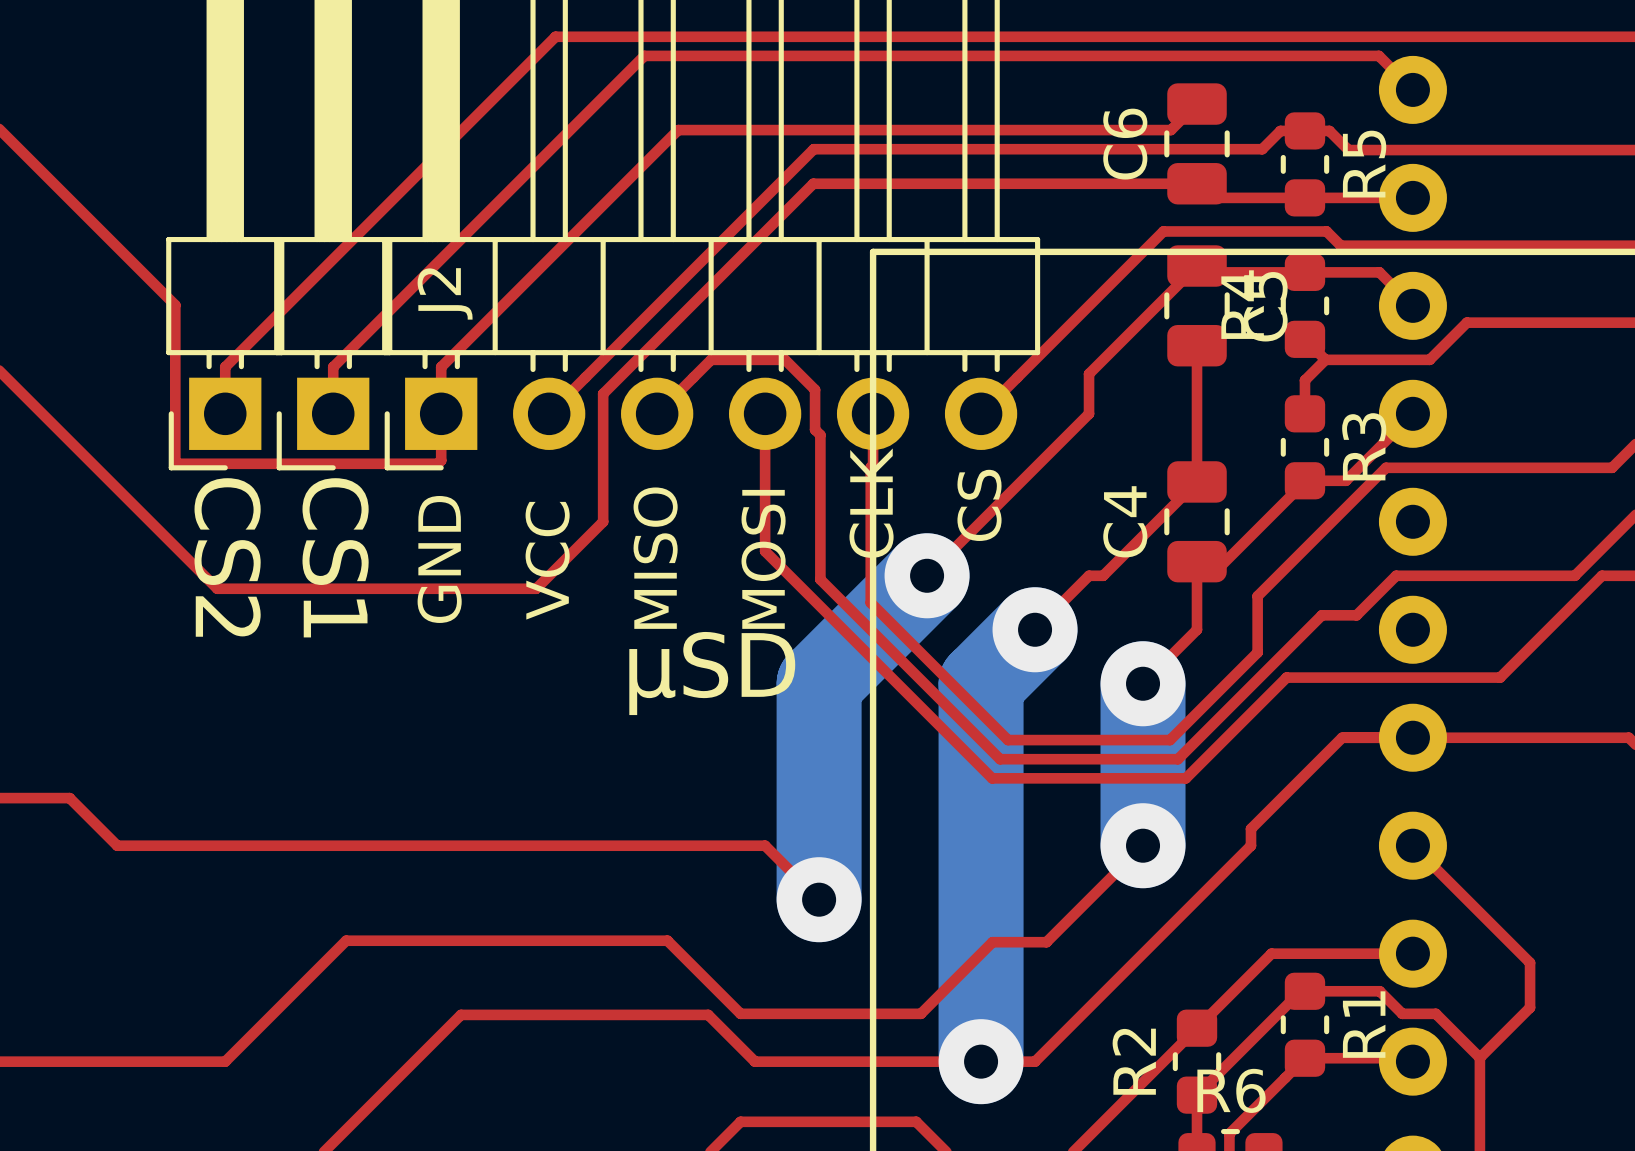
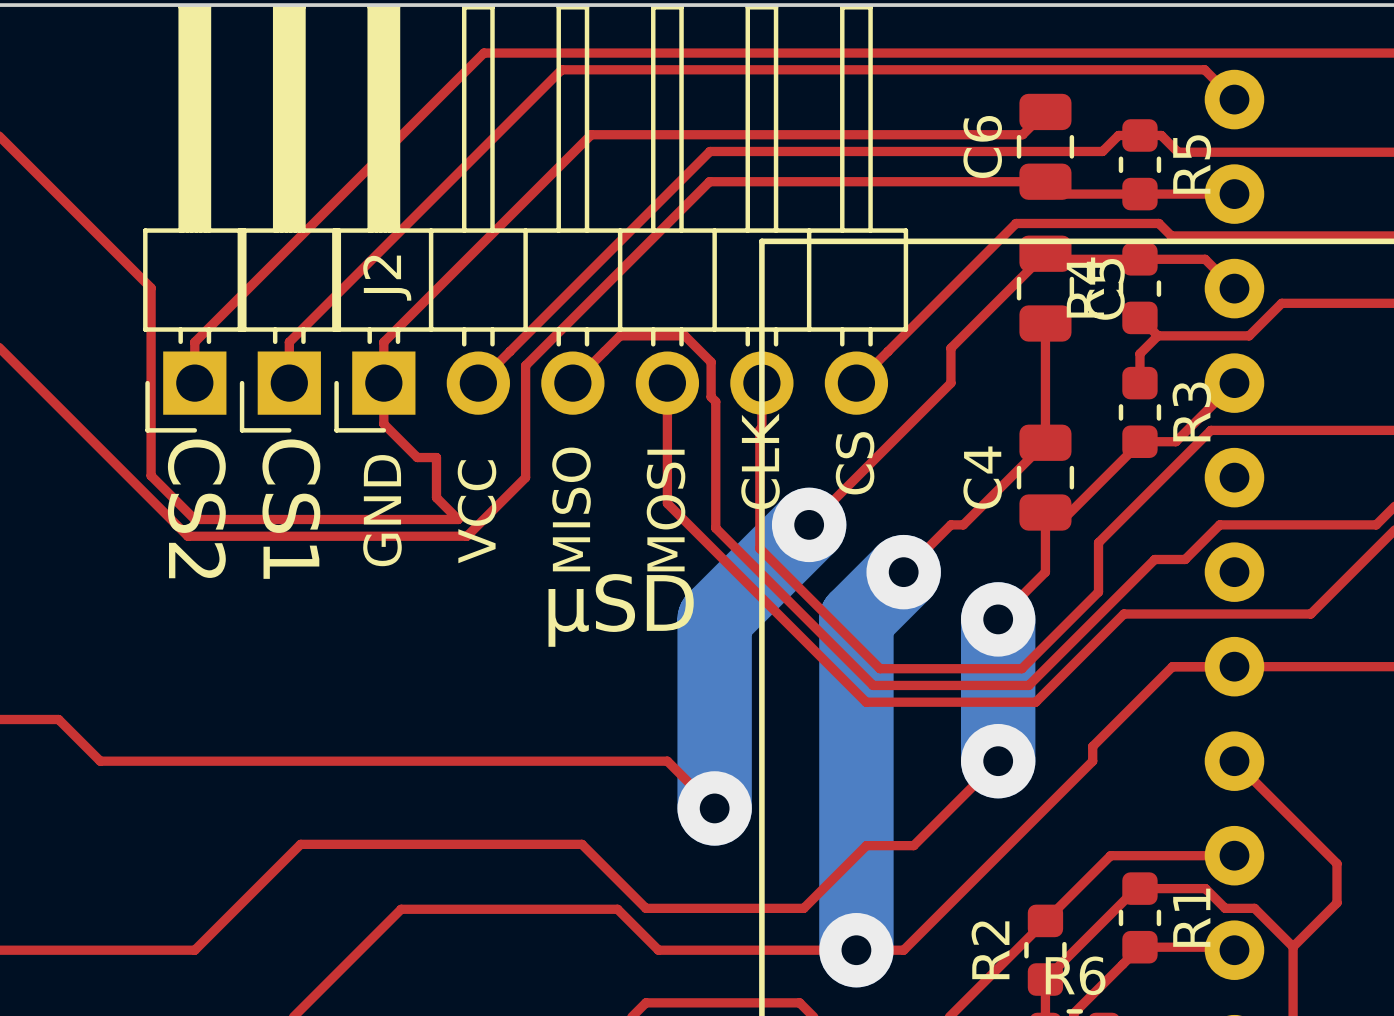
top track: (441, 460) (438, 463) (178, 463) (175, 461) -> (383, 424) (417, 457) (436, 457) (436, 497) (458, 519) (194, 519) (151, 475) (151, 424)

